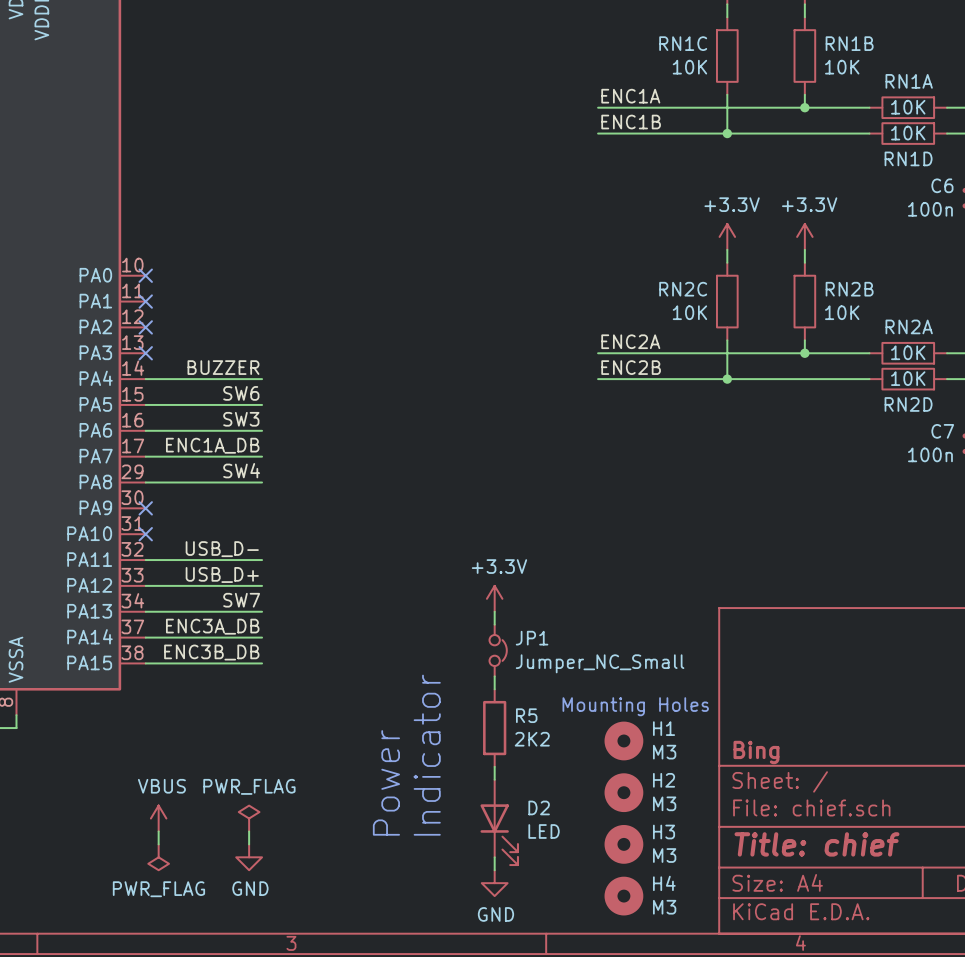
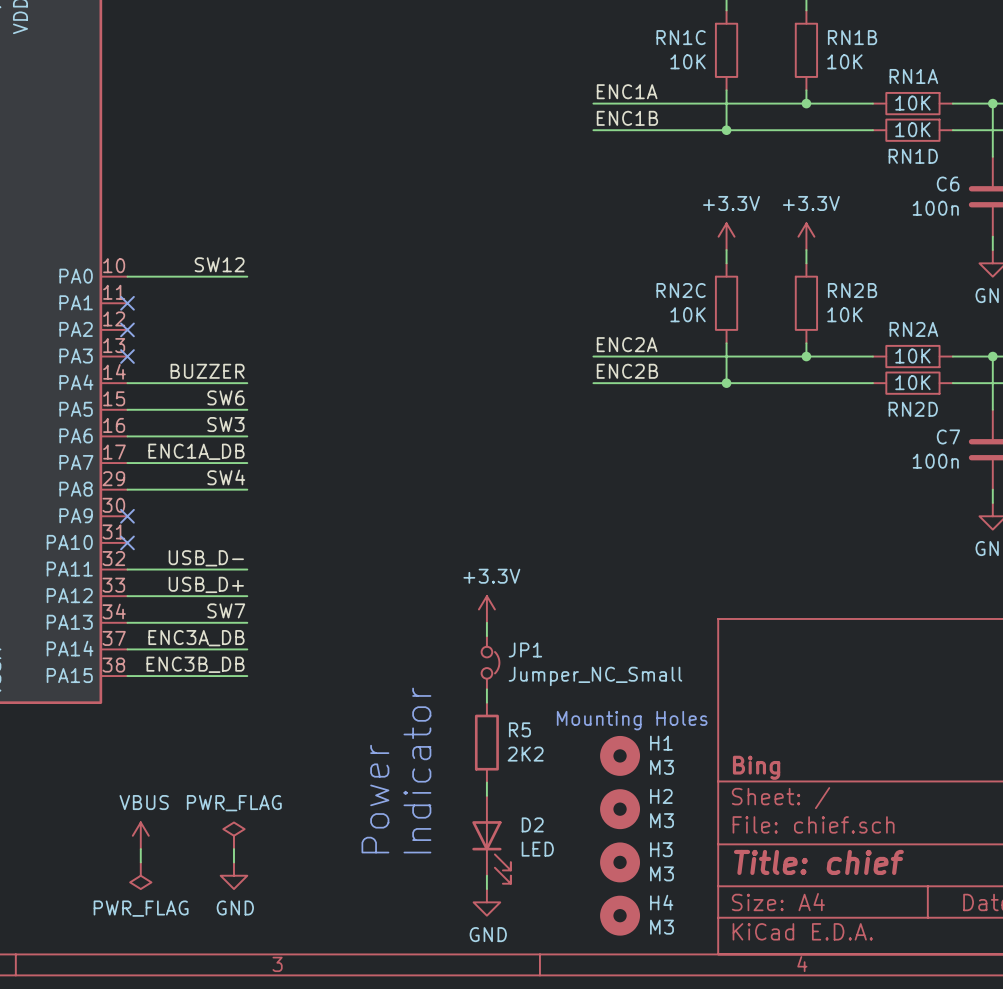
label: none -> SW12 (219, 264)
wire: none -> (127, 276) (247, 276)
no-connect mark: (145, 275) -> none

